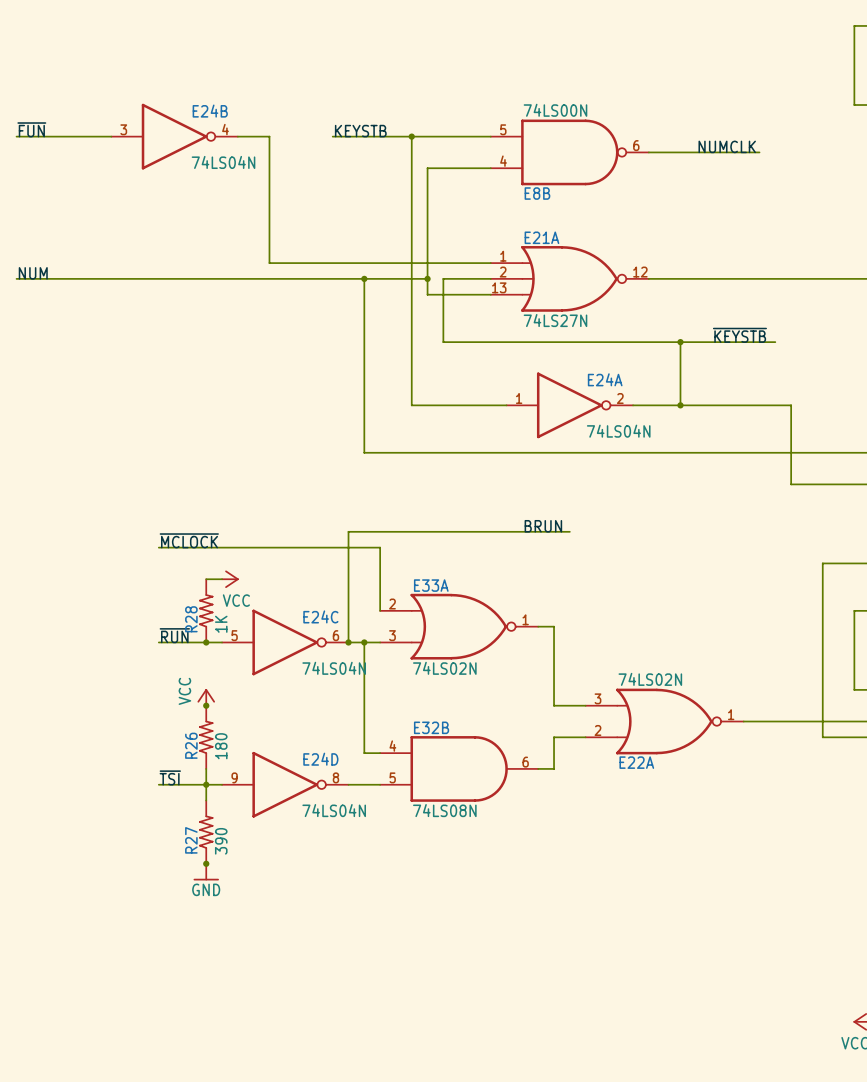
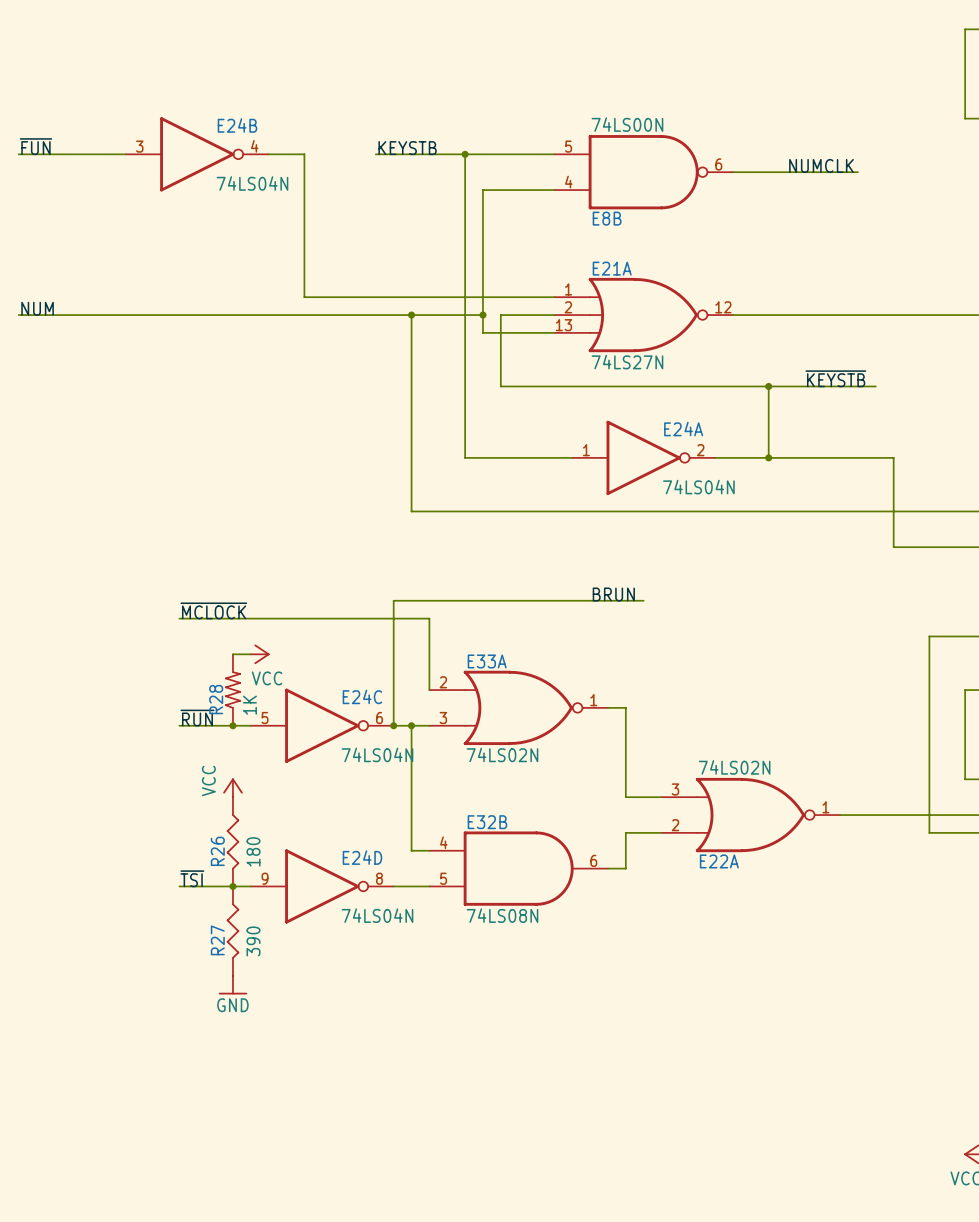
R26 symbol: [199, 705, 214, 769] -> [226, 797, 240, 887]
junction: (206, 705) -> none
R27 symbol: [199, 800, 214, 864] -> [226, 886, 240, 976]
junction: (206, 863) -> none

